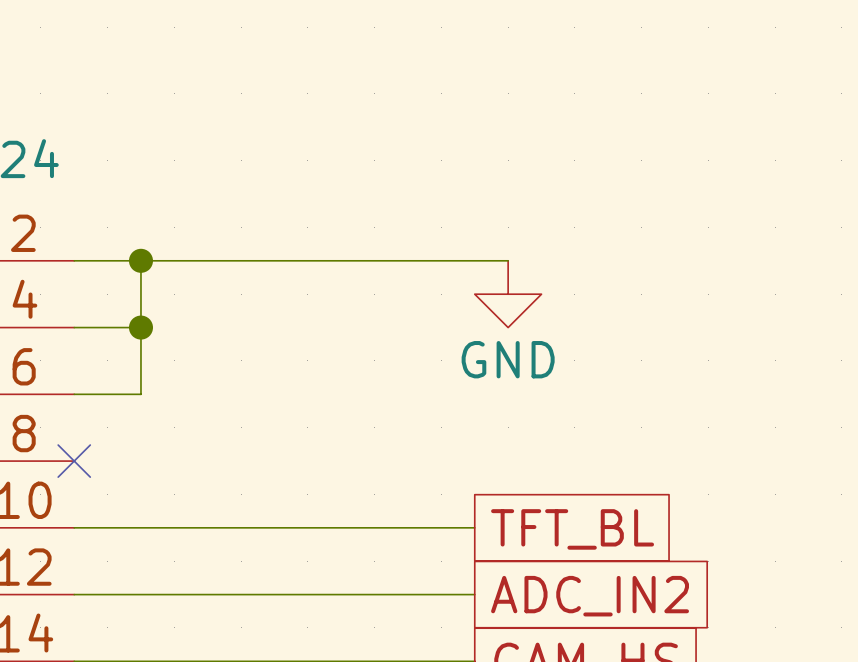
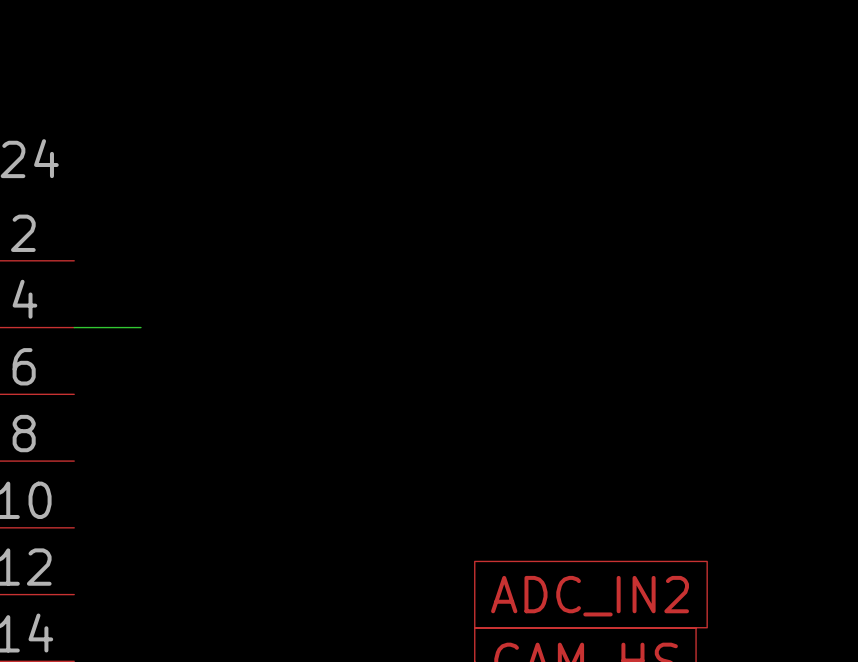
wire: (74, 260) (508, 260) -> none
wire: (140, 260) (140, 394) (74, 394) -> none
junction: (140, 260) -> none
power symbol: GND (508, 294) -> none
junction: (140, 327) -> none
no-connect mark: (74, 461) -> none
wire: (74, 527) (474, 527) -> none
global label: TFT_BL (572, 529) -> none
wire: (74, 594) (474, 594) -> none
wire: (74, 661) (474, 661) -> none

